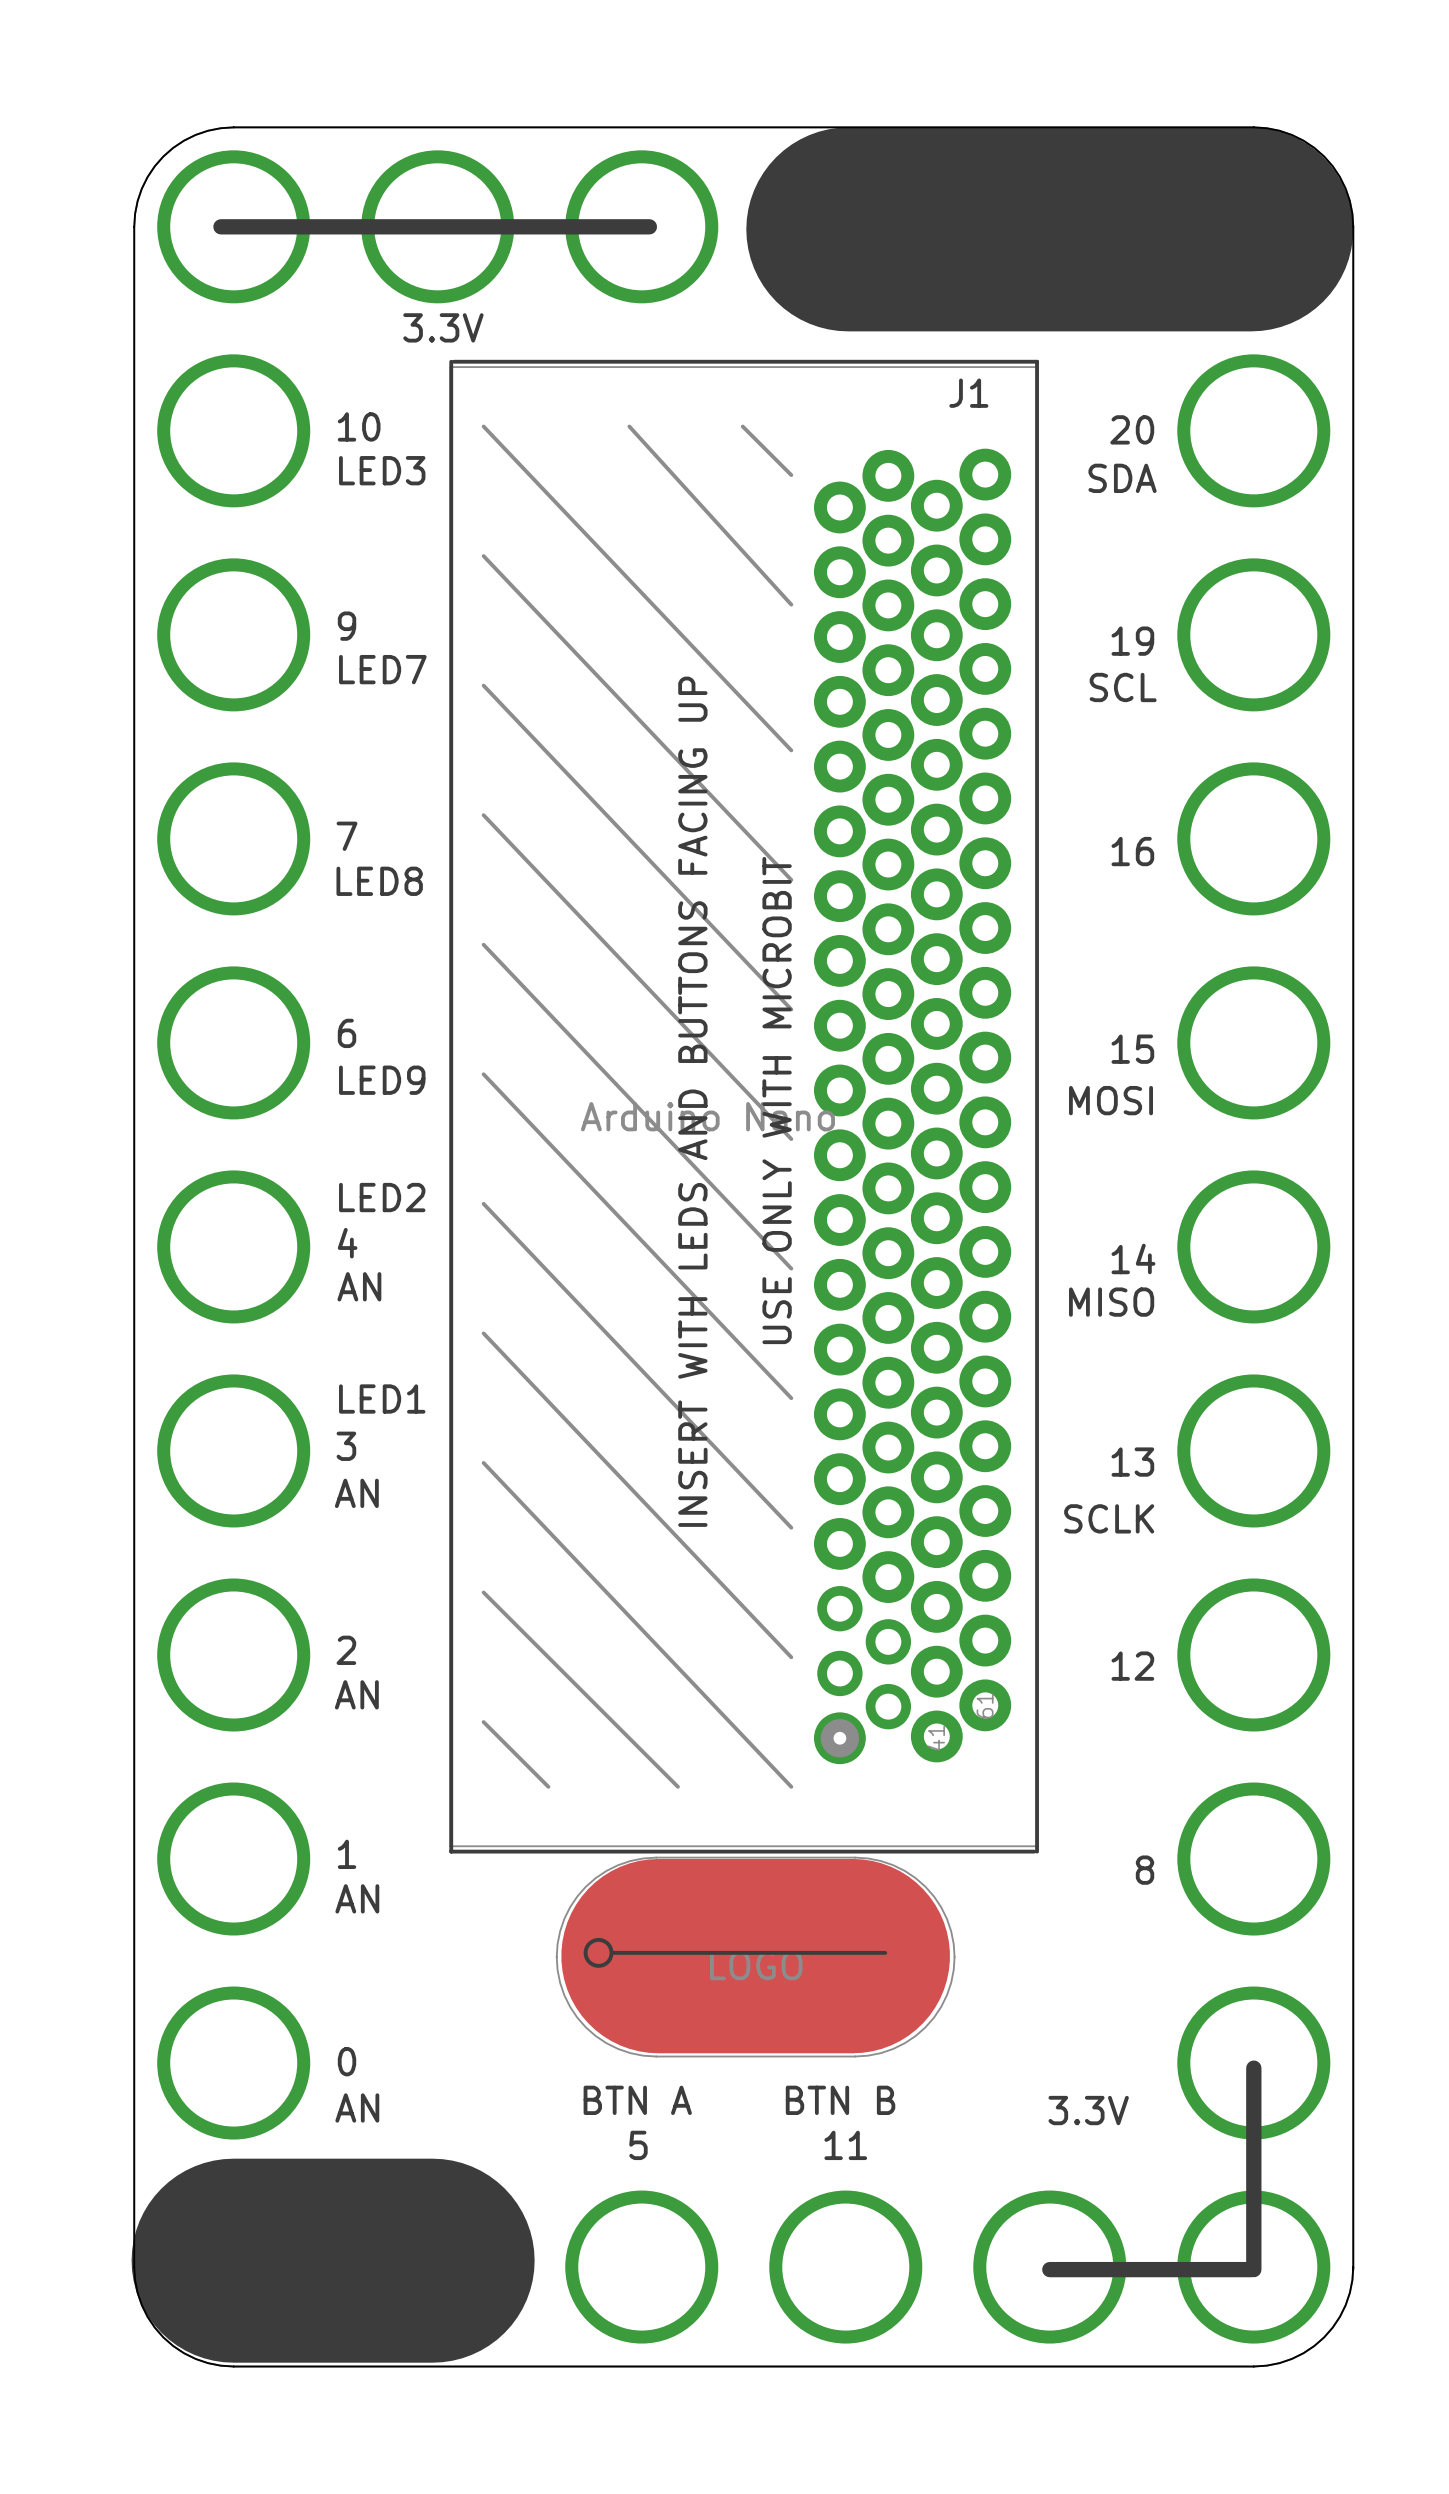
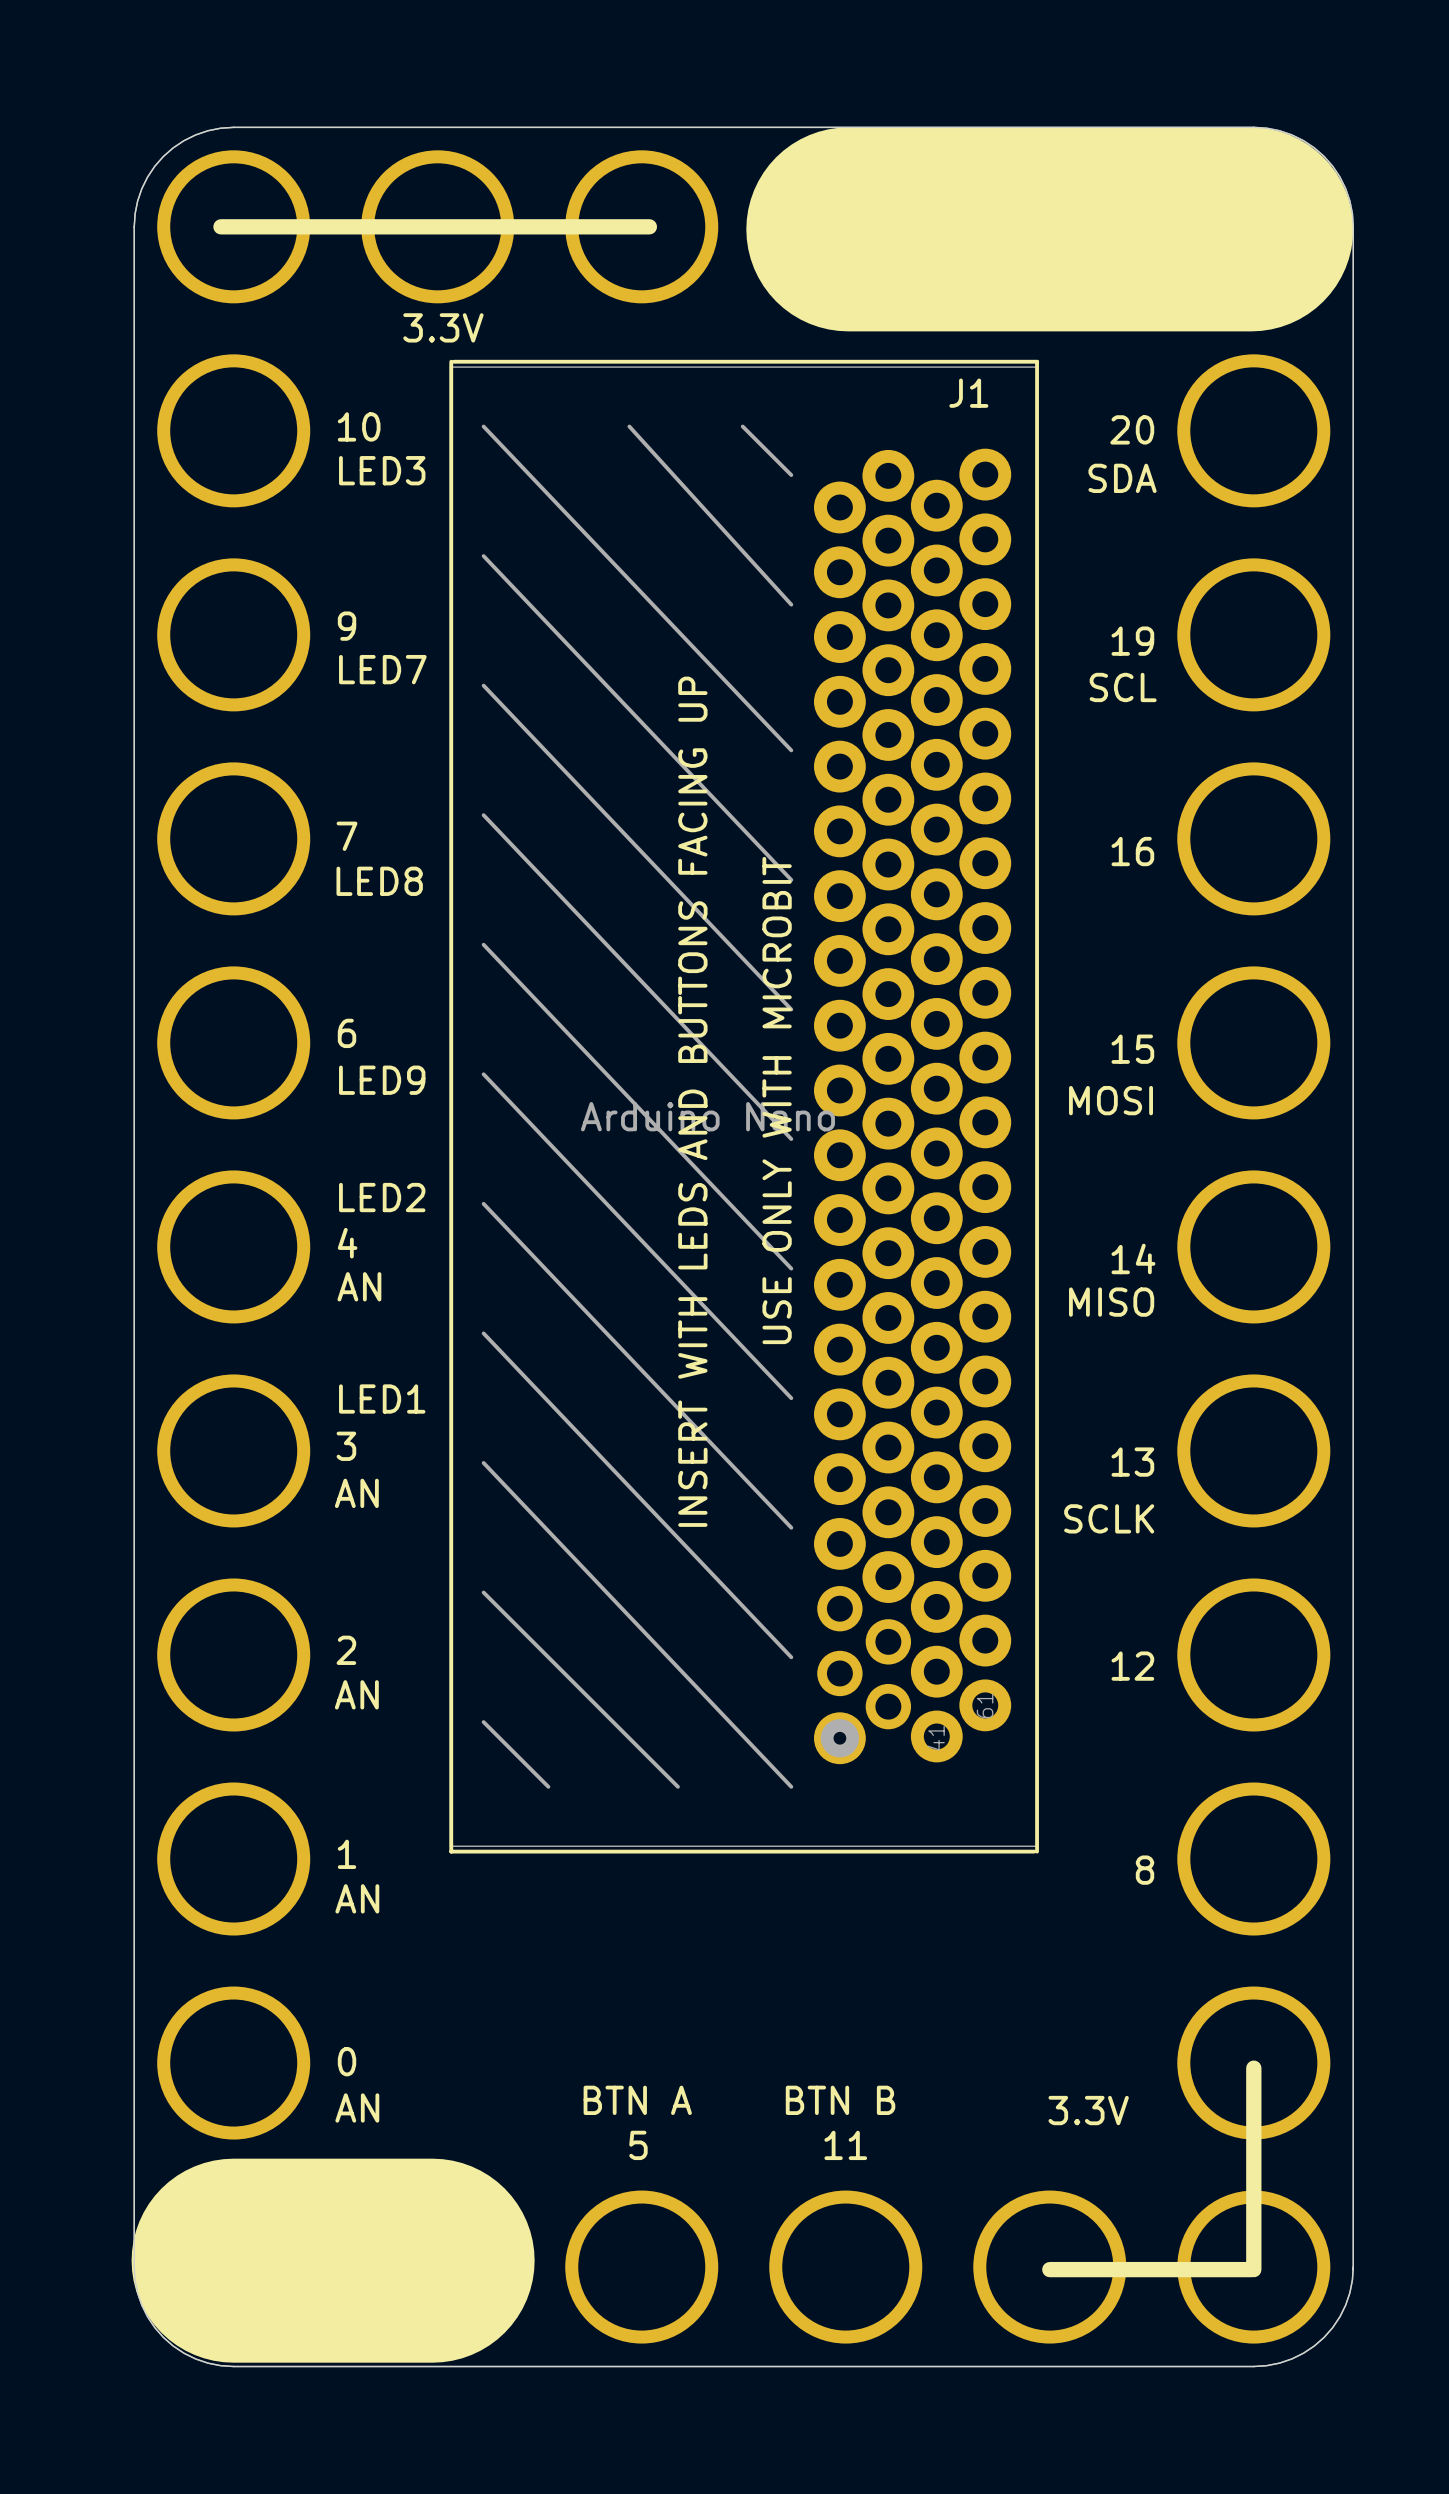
part: (755, 1957) -> none

